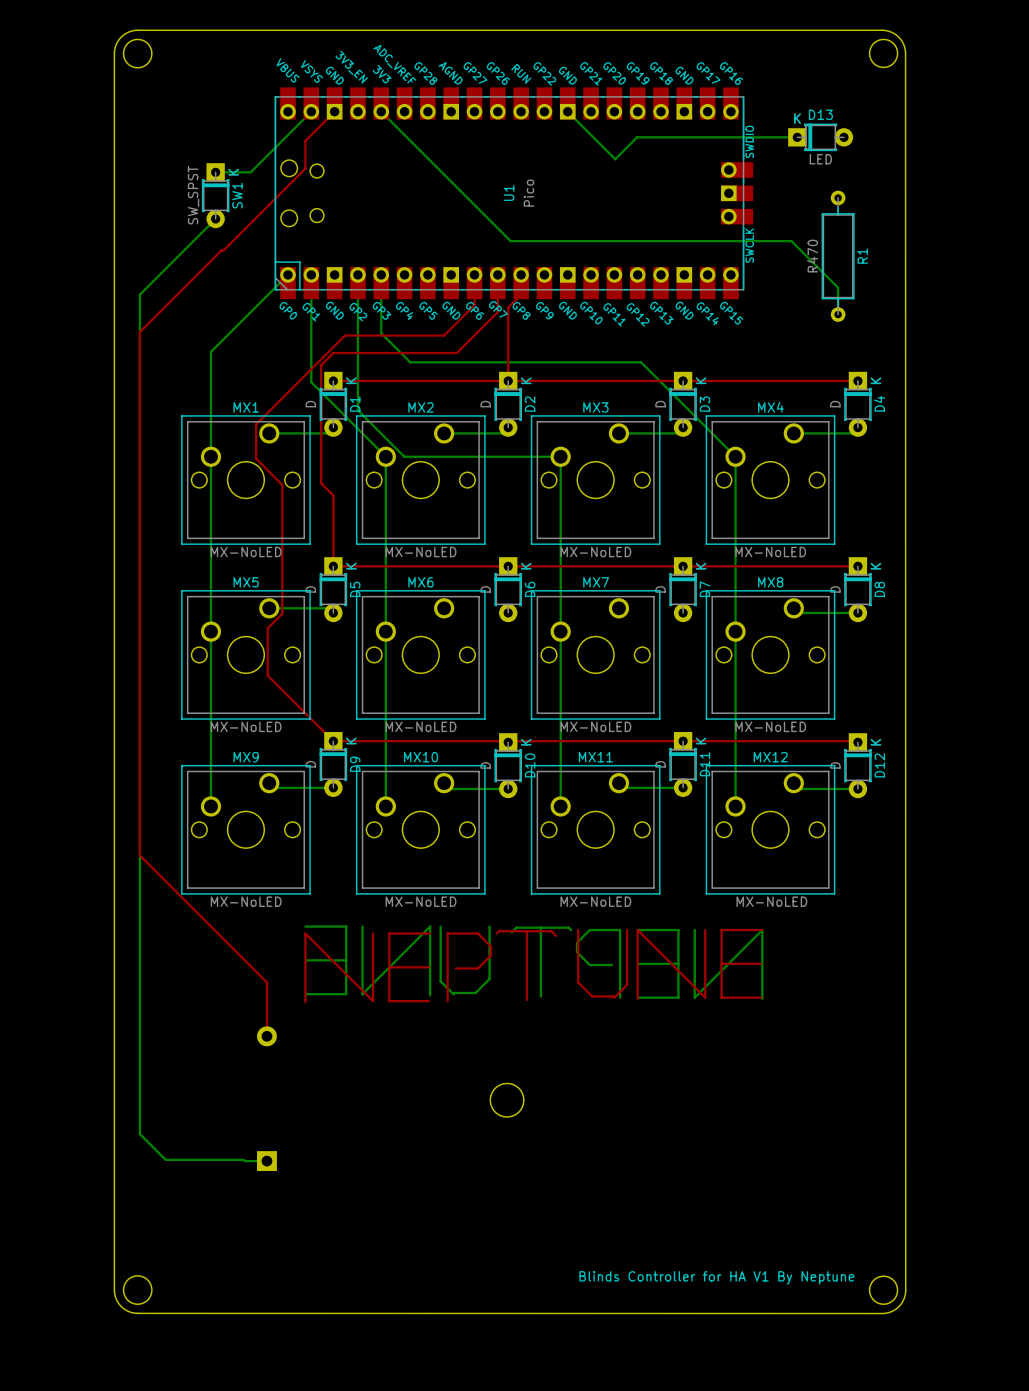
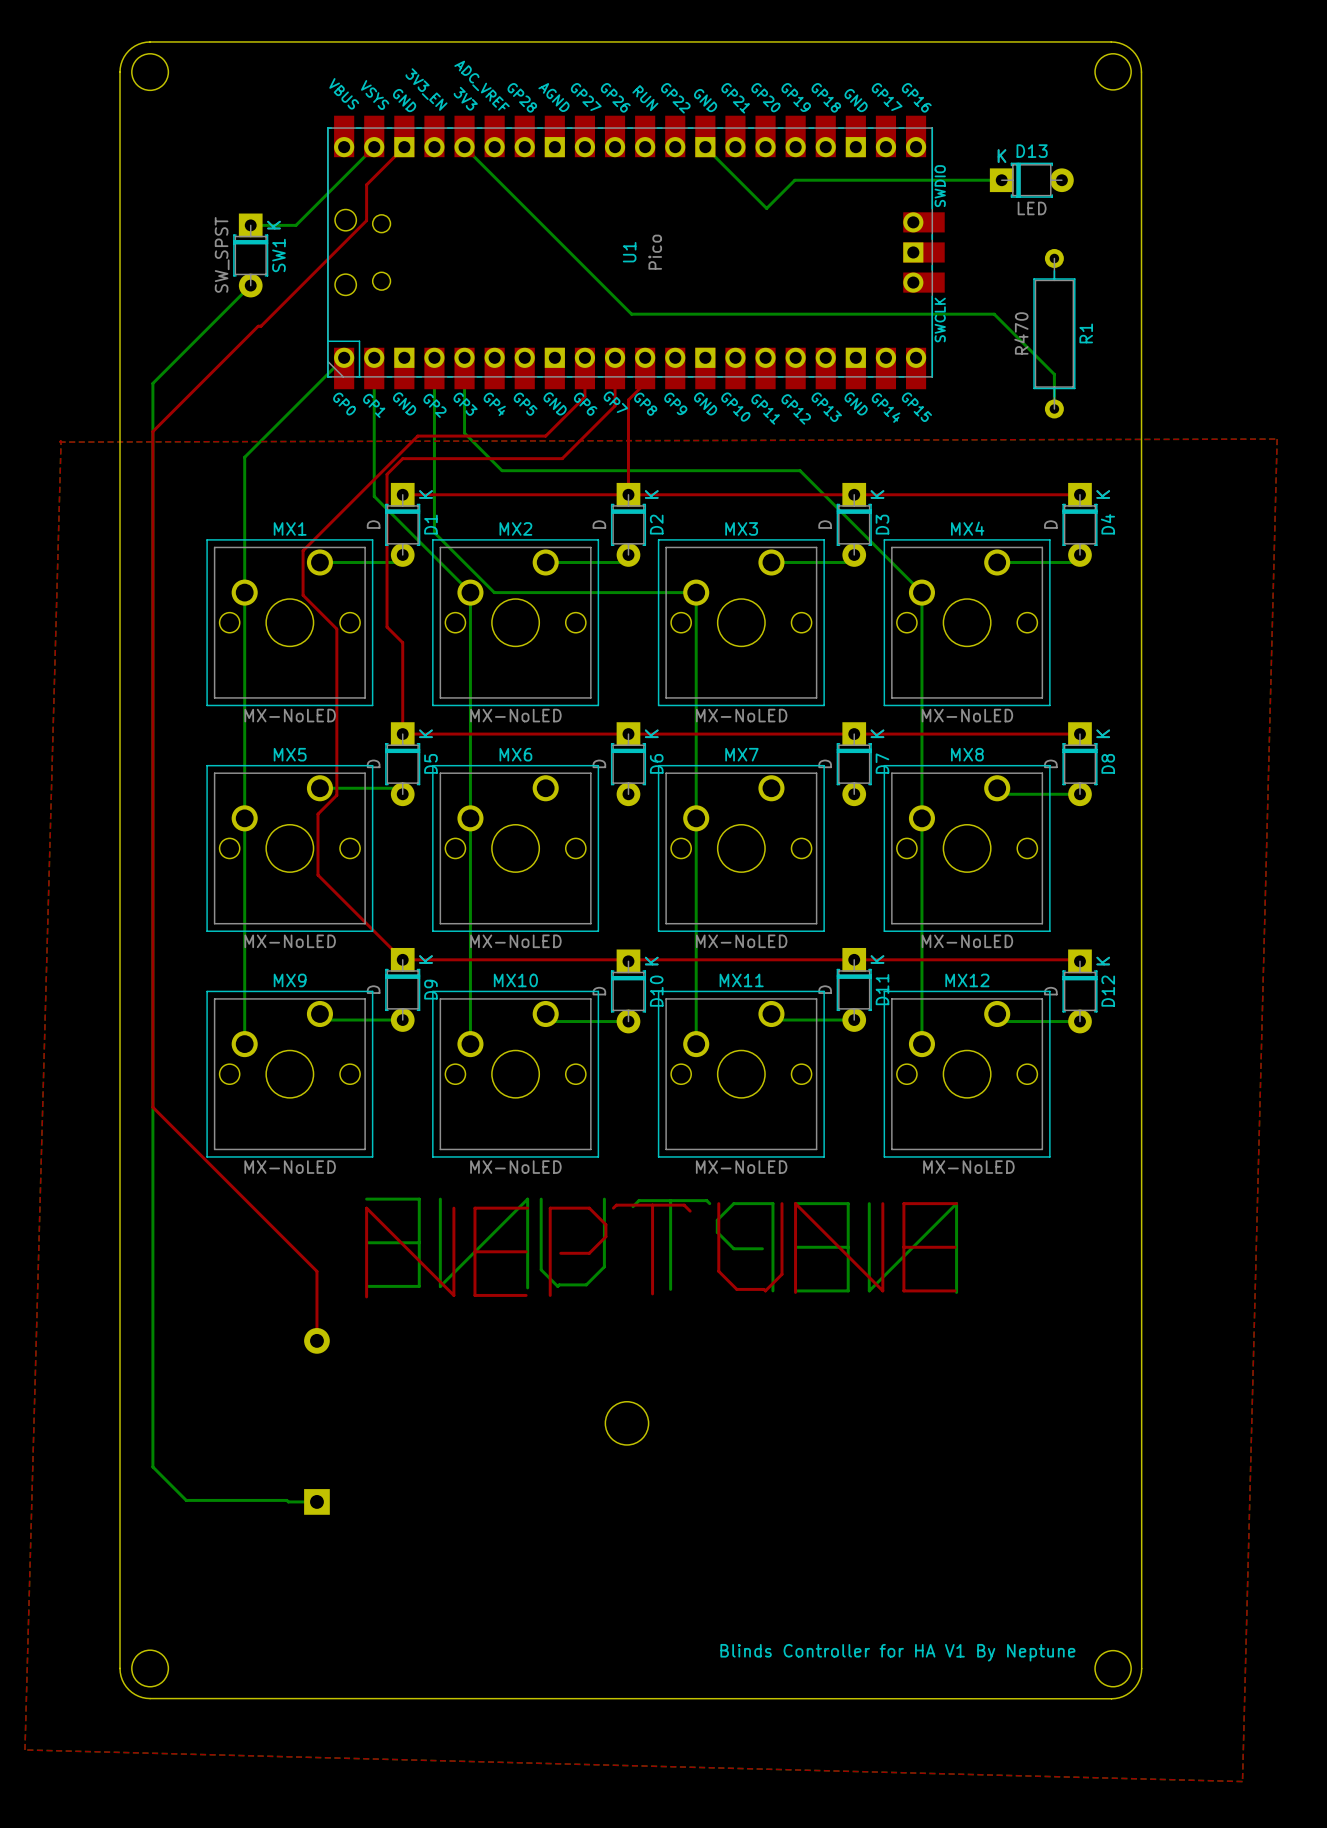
top zone outline: none -> (1277, 439) (59, 442) (61, 440) (24, 1749) (1242, 1781) (1277, 439)

